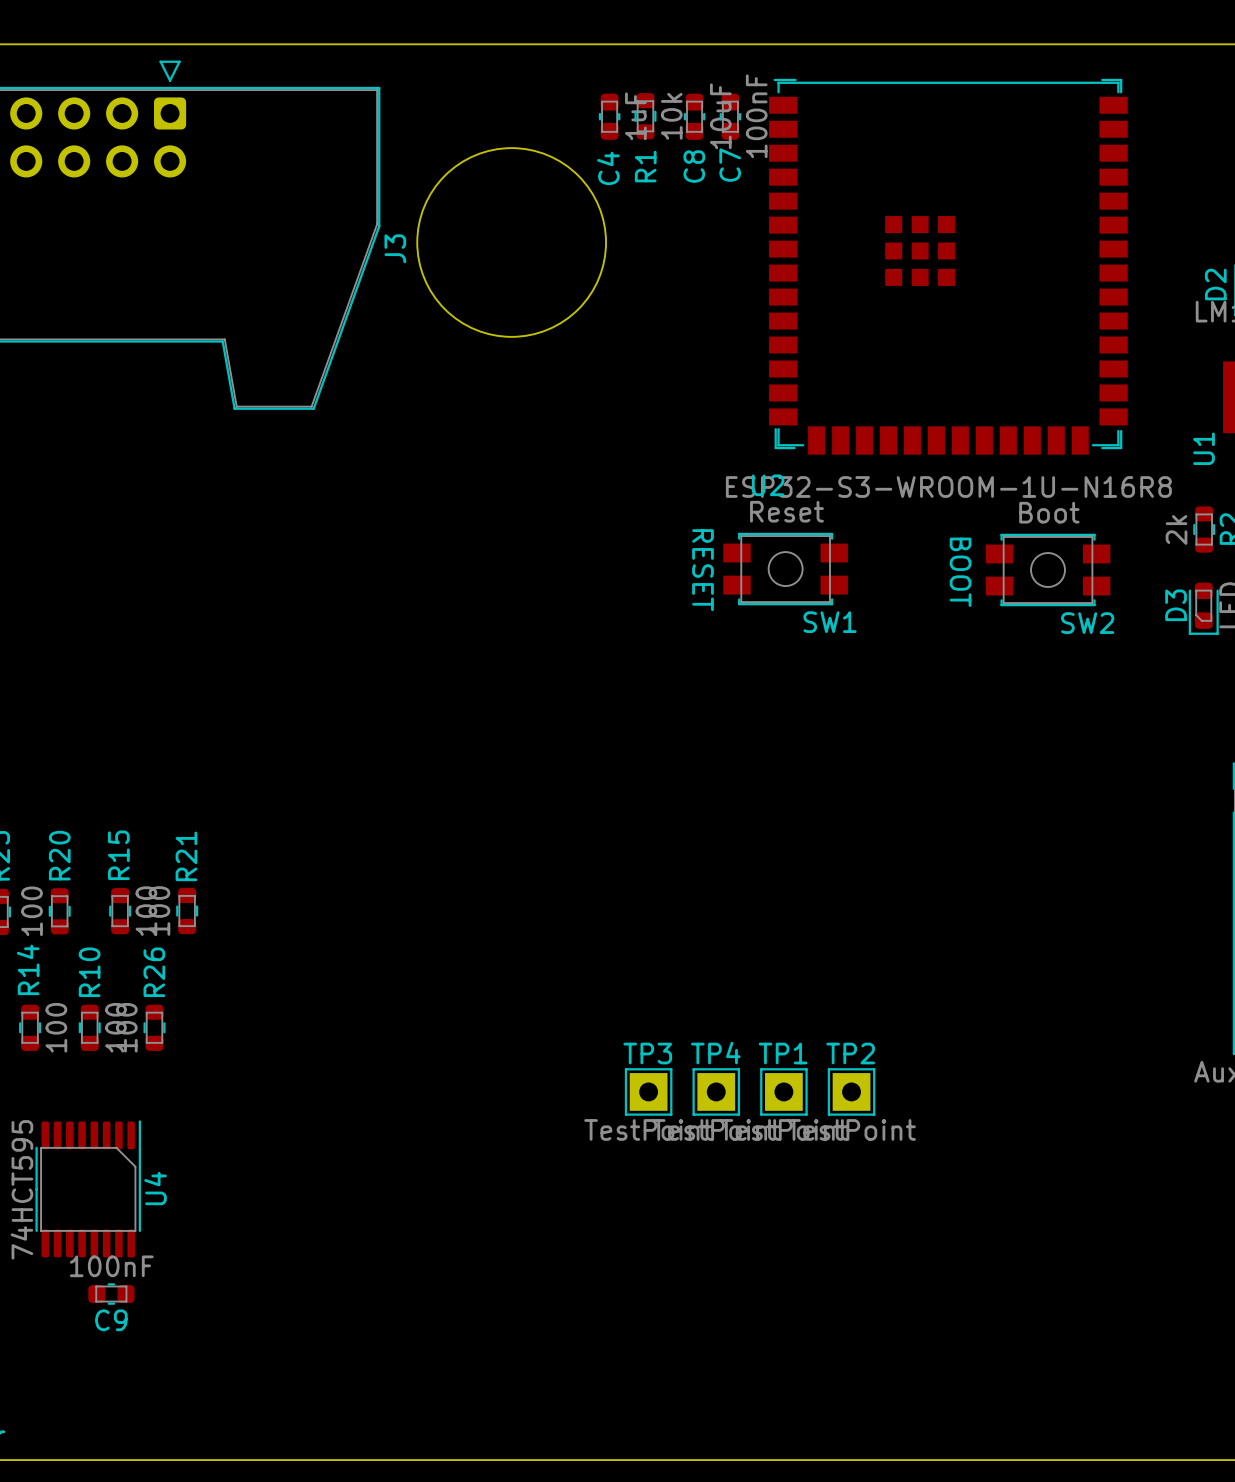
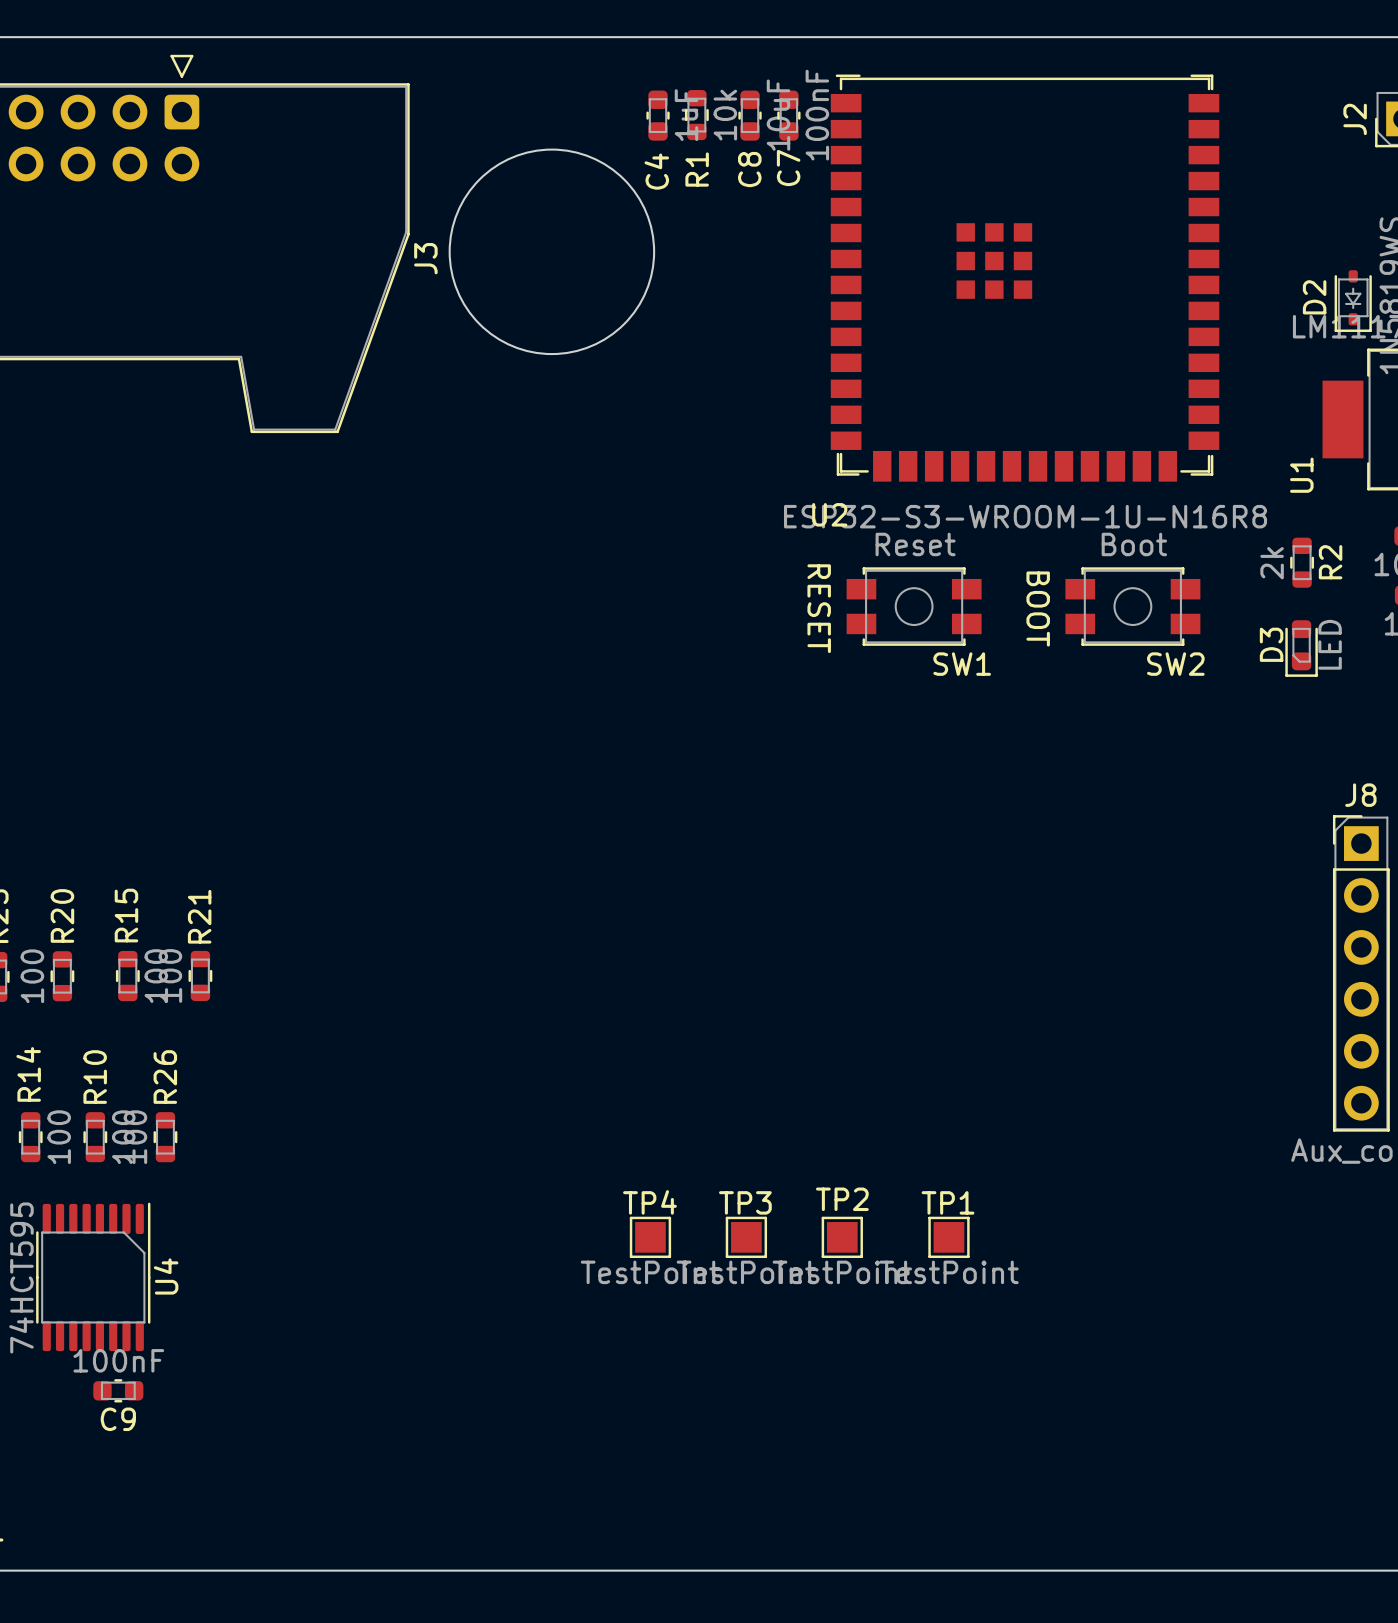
SW1 position: (785, 569) -> (914, 606)
text position: RESET (703, 570) -> RESET (819, 608)
R14 position: (30, 1027) -> (30, 1137)
R10 position: (89, 1027) -> (95, 1137)
R26 position: (154, 1027) -> (165, 1137)
TP3 footprint: [624, 1068, 673, 1116] -> [725, 1216, 768, 1259]
TP4 footprint: [692, 1068, 741, 1116] -> [629, 1216, 672, 1259]
TP1 footprint: [760, 1068, 808, 1116] -> [928, 1216, 970, 1259]
TP2 footprint: [827, 1068, 876, 1116] -> [821, 1216, 863, 1259]

